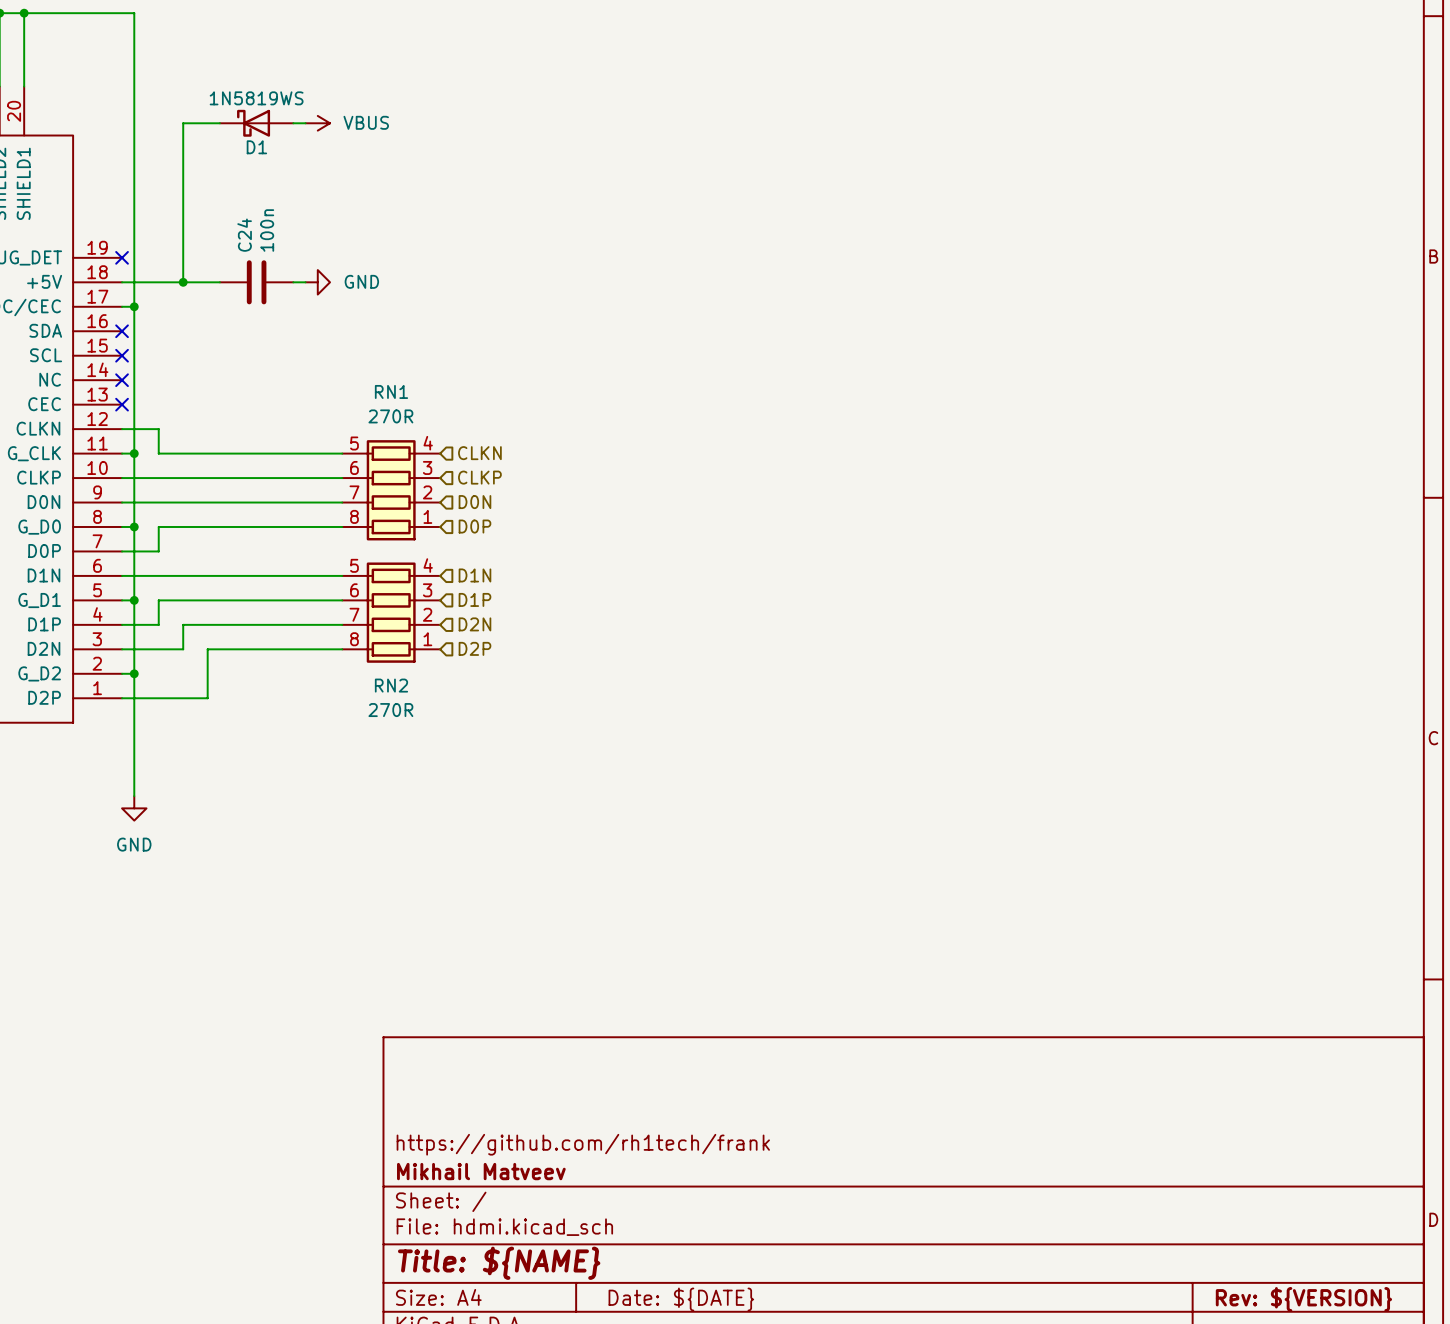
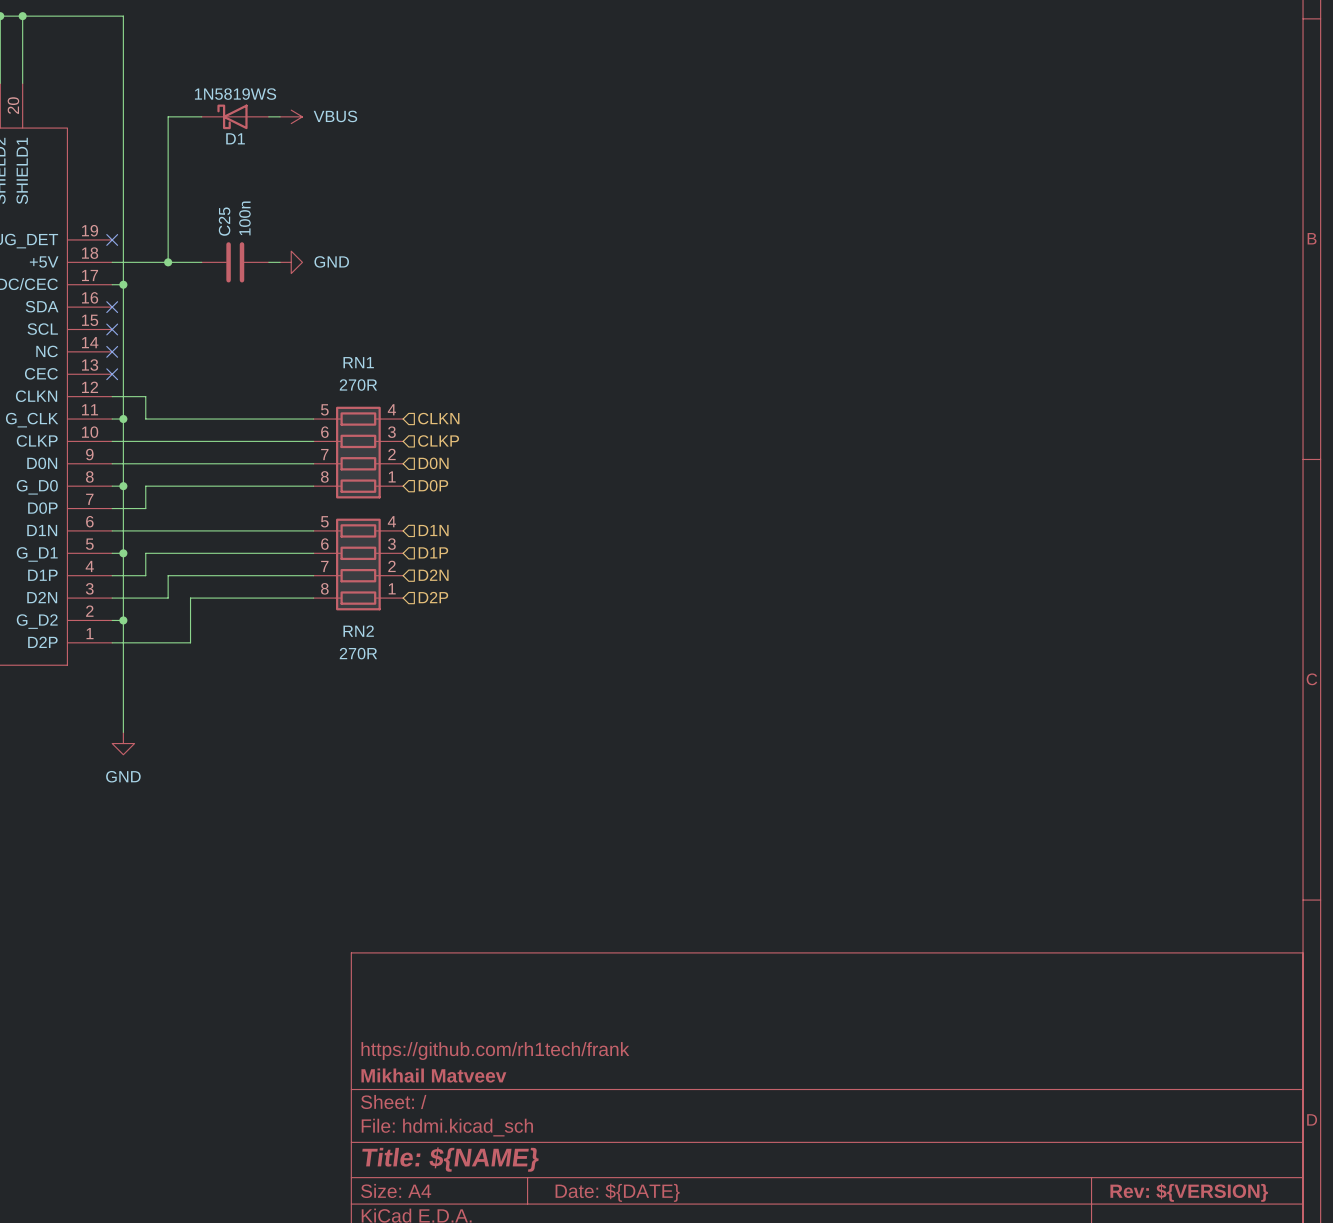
C24 name: C24 (244, 235) -> C25 (224, 221)

